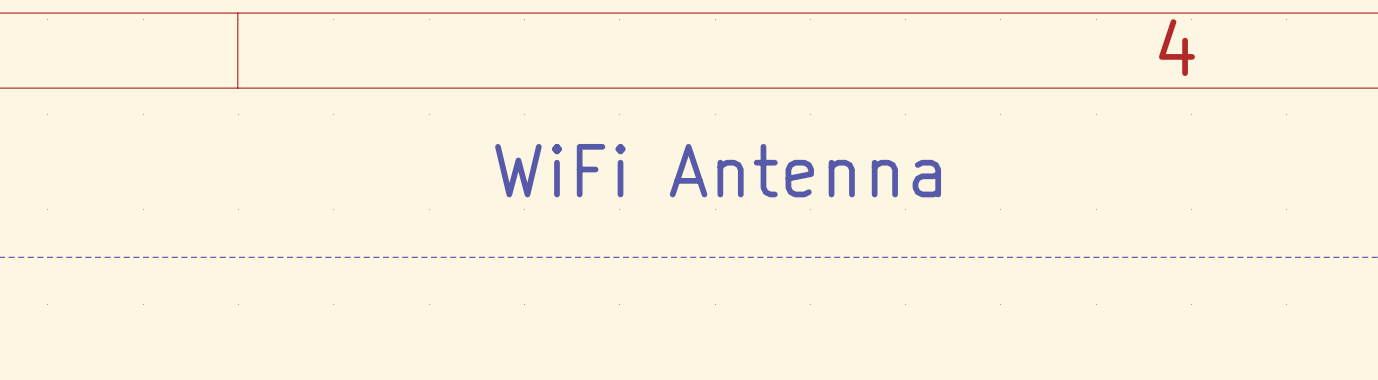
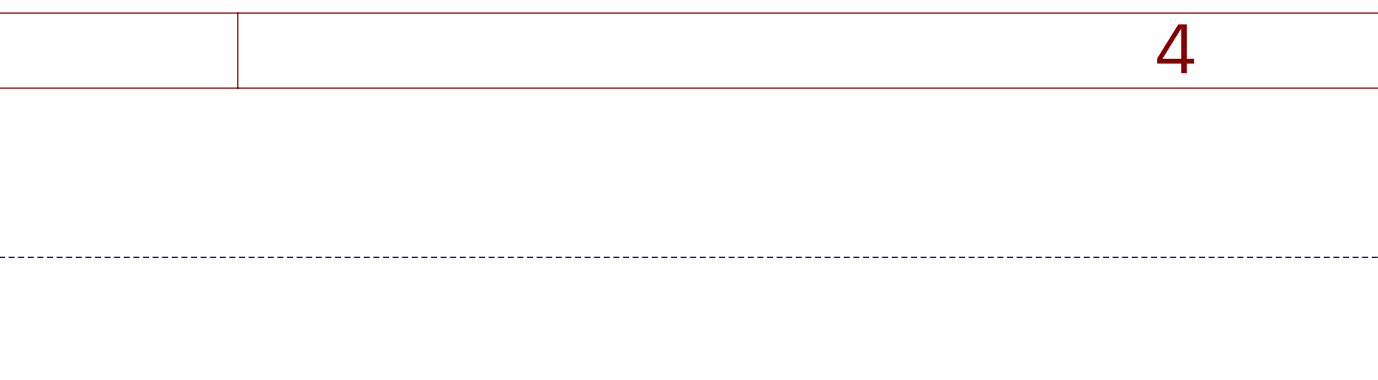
text: WiFi Antenna (718, 170) -> none

